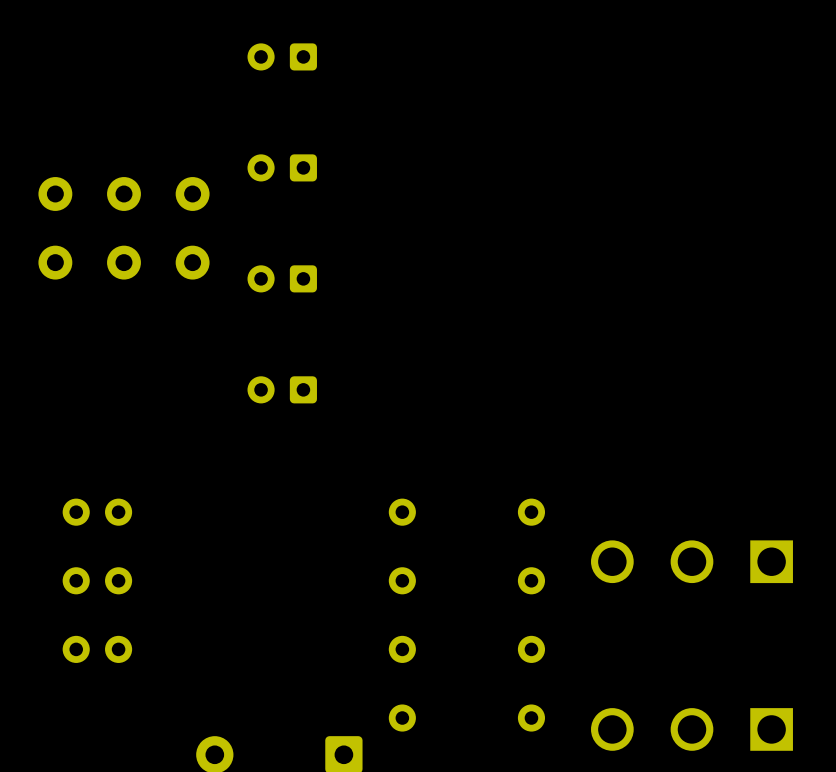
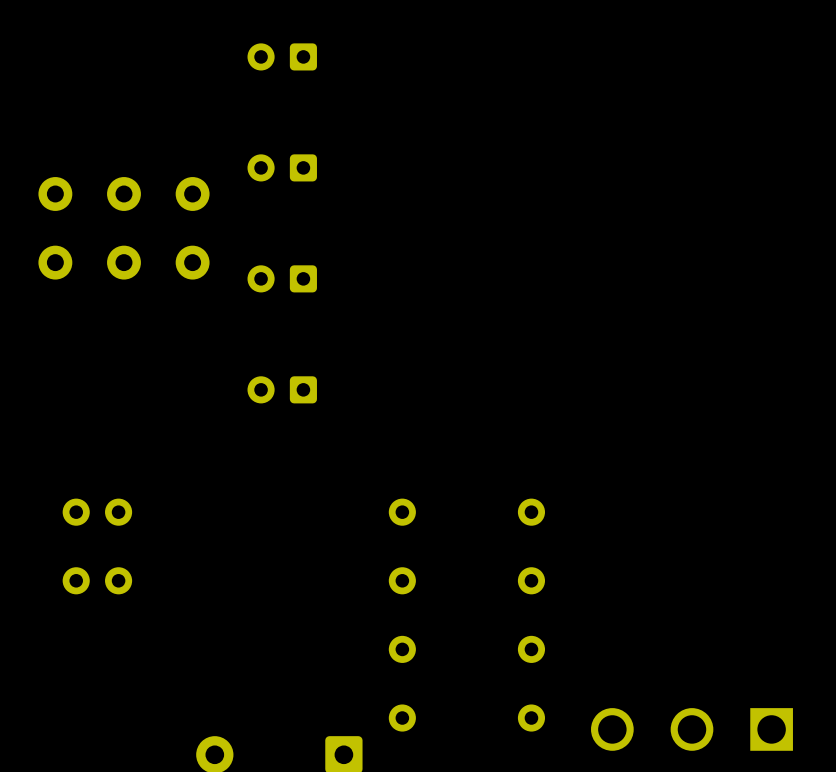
part: (691, 561) -> none
part: (97, 649) -> none

